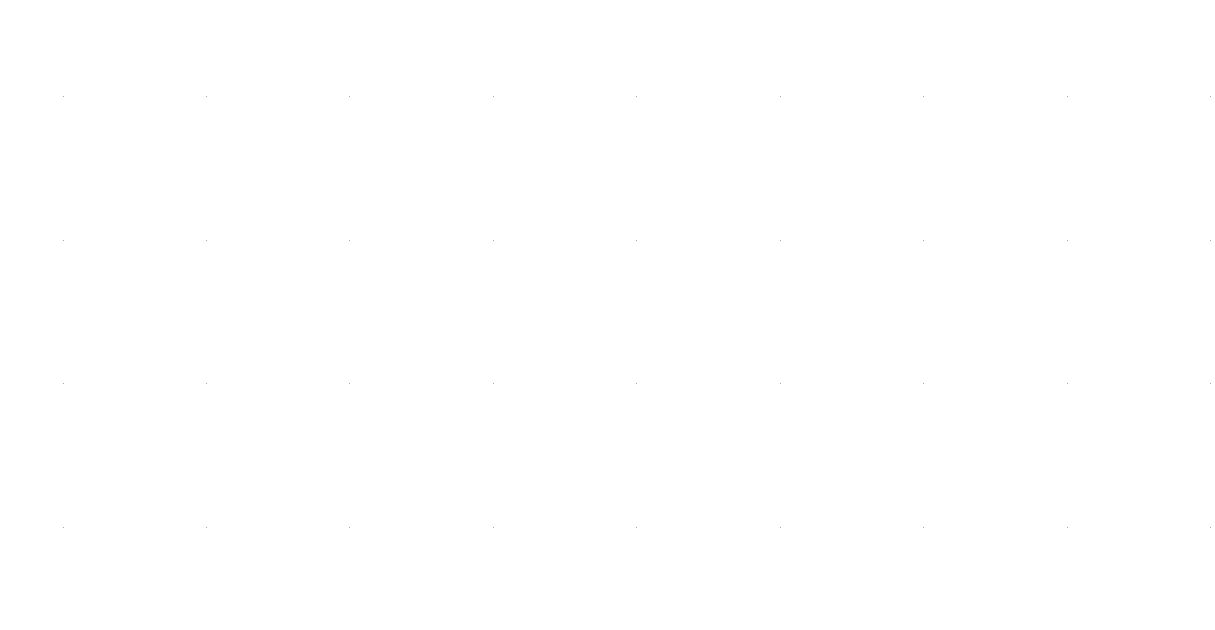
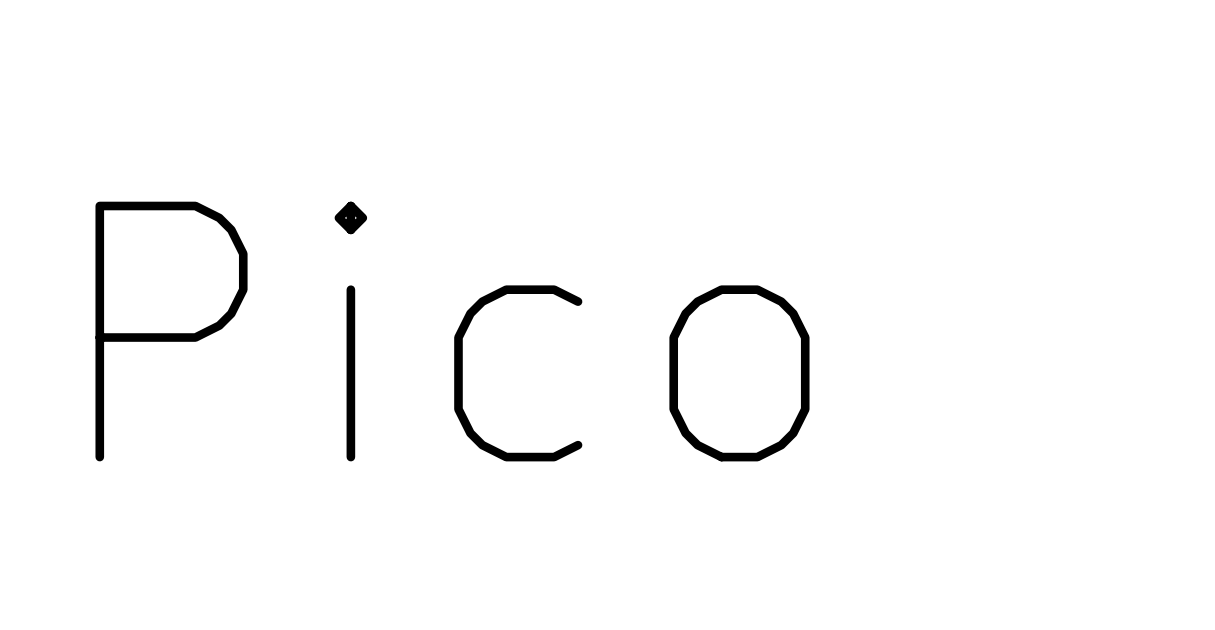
text: none -> Pico (452, 331)

